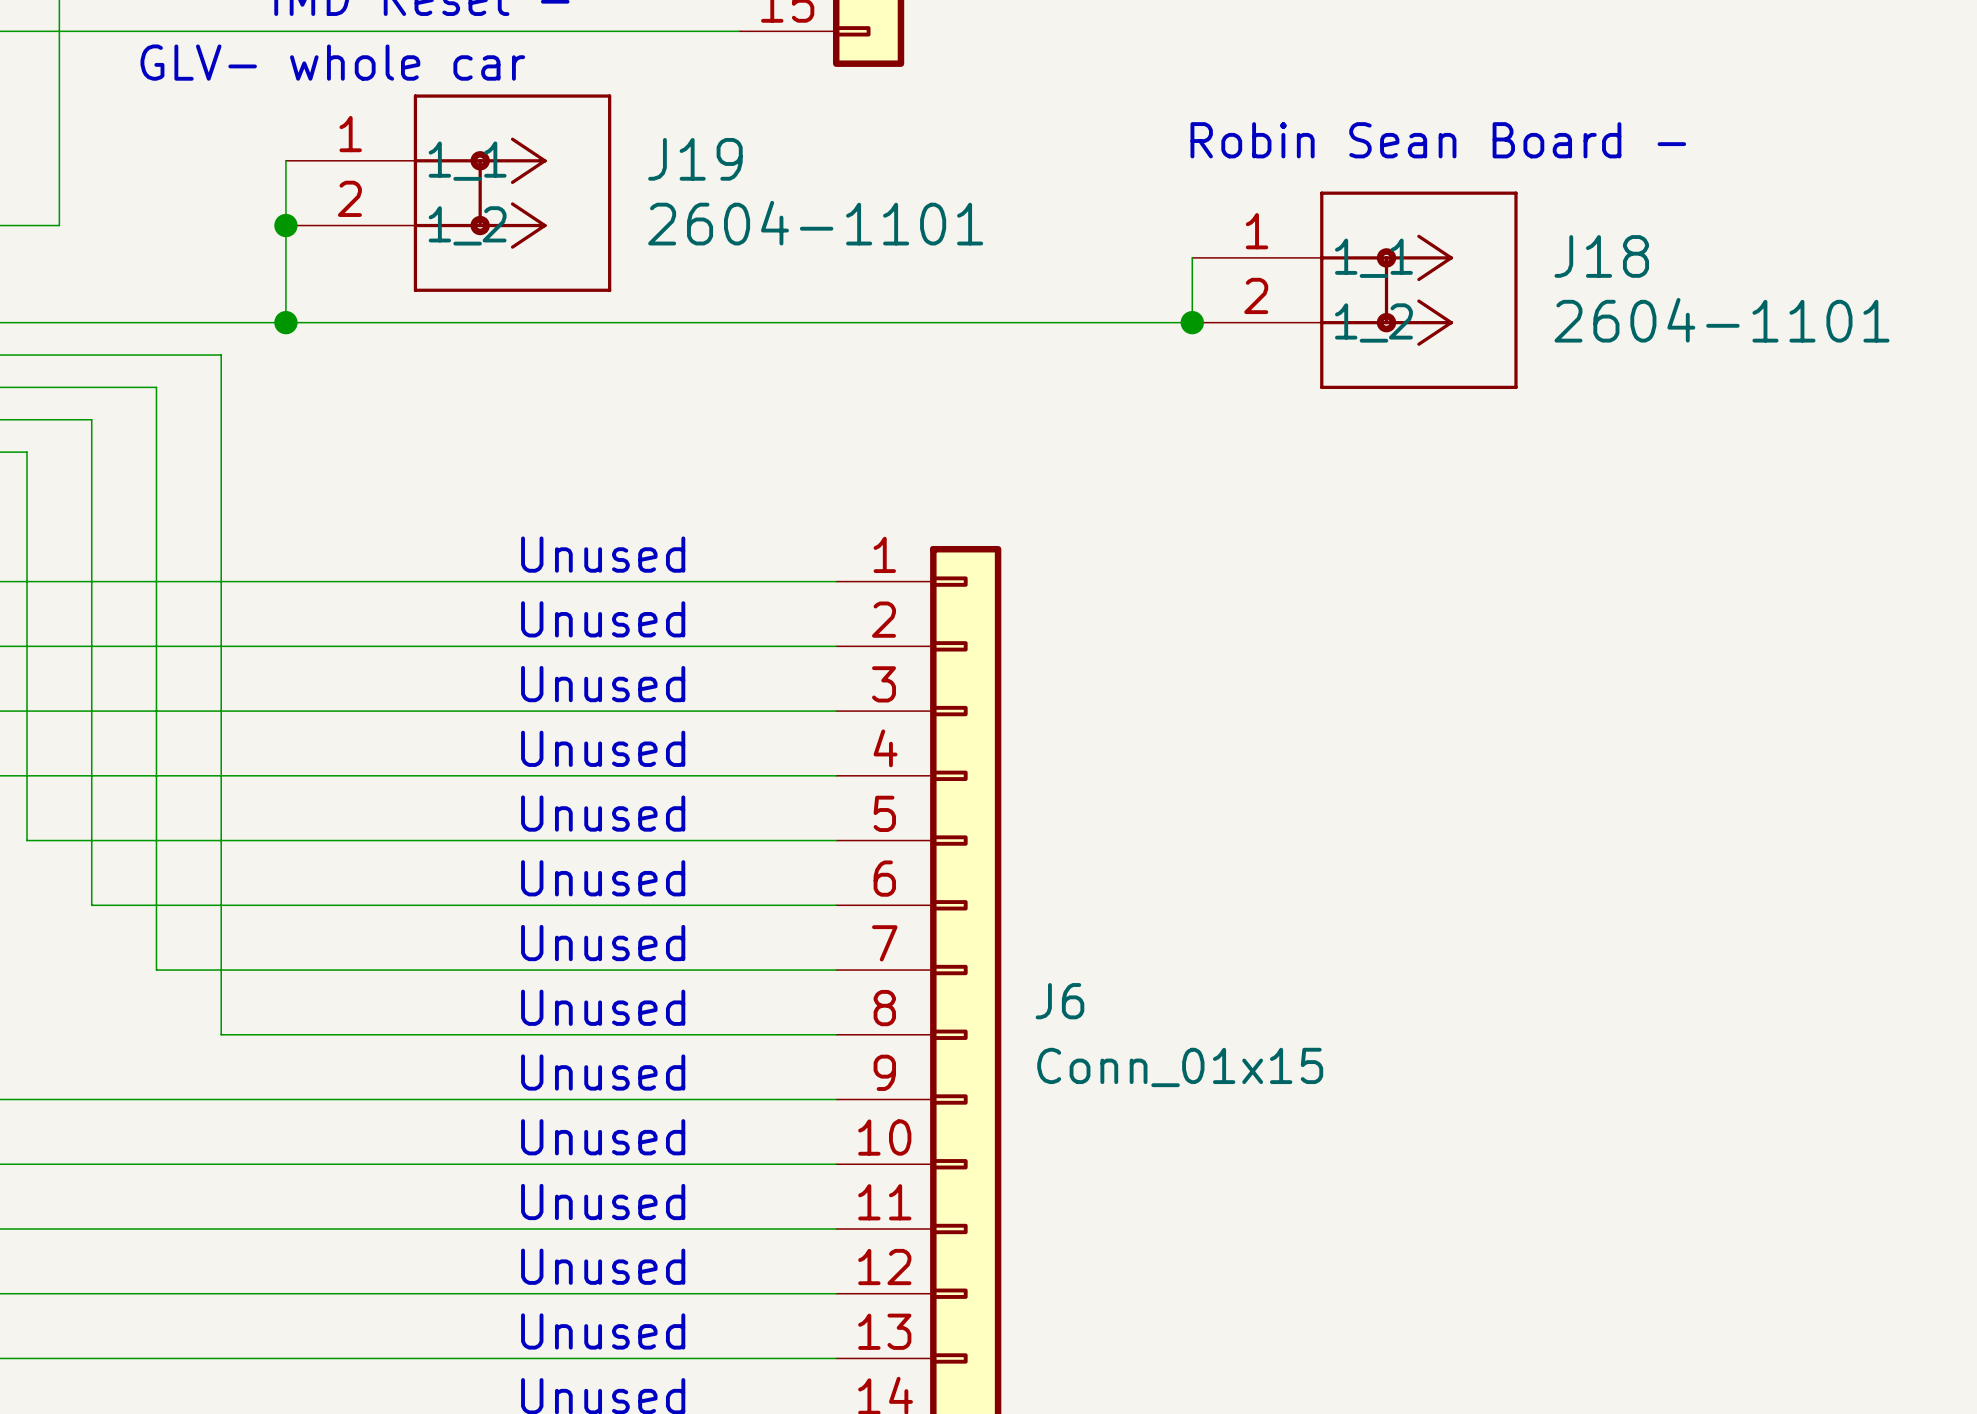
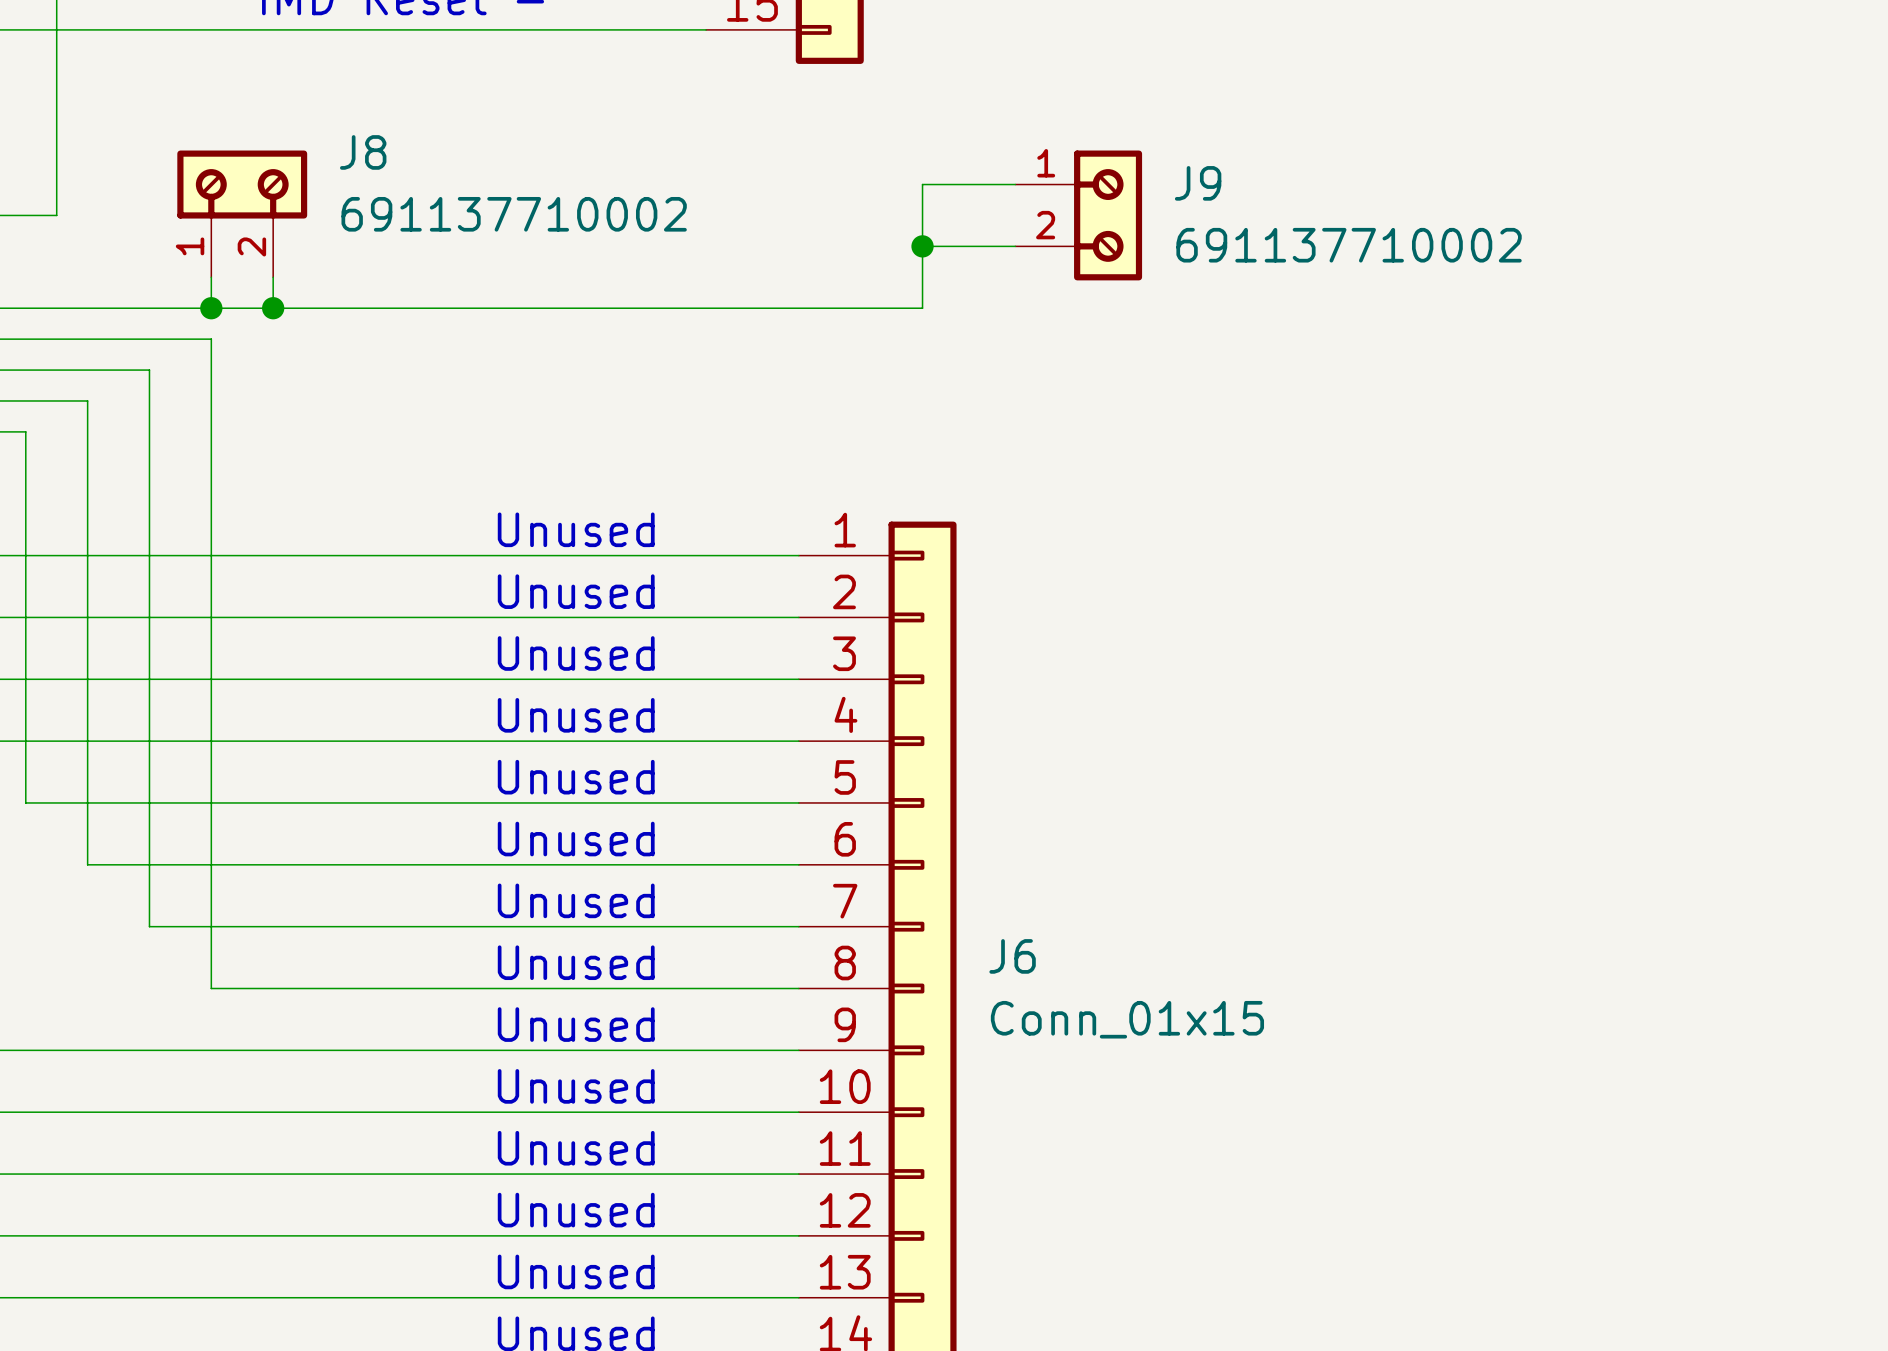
text: GLV- whole car (332, 62) -> none
text: Robin Sean Board - (1438, 140) -> none
J19: 2604-1101 (448, 193) -> none
J8: none -> 691137710002 (242, 213)
junction position: (285, 225) -> (211, 308)
J9: none -> 691137710002 (1078, 215)
wire: none -> (922, 246) (1015, 246)
junction: none -> (922, 246)
wire: (1192, 257) (1192, 322) (965, 322) -> (1015, 184) (922, 184) (922, 308)
wire: none -> (211, 277) (211, 308)
J18: 2604-1101 (1354, 290) -> none
junction: (1192, 322) -> none

